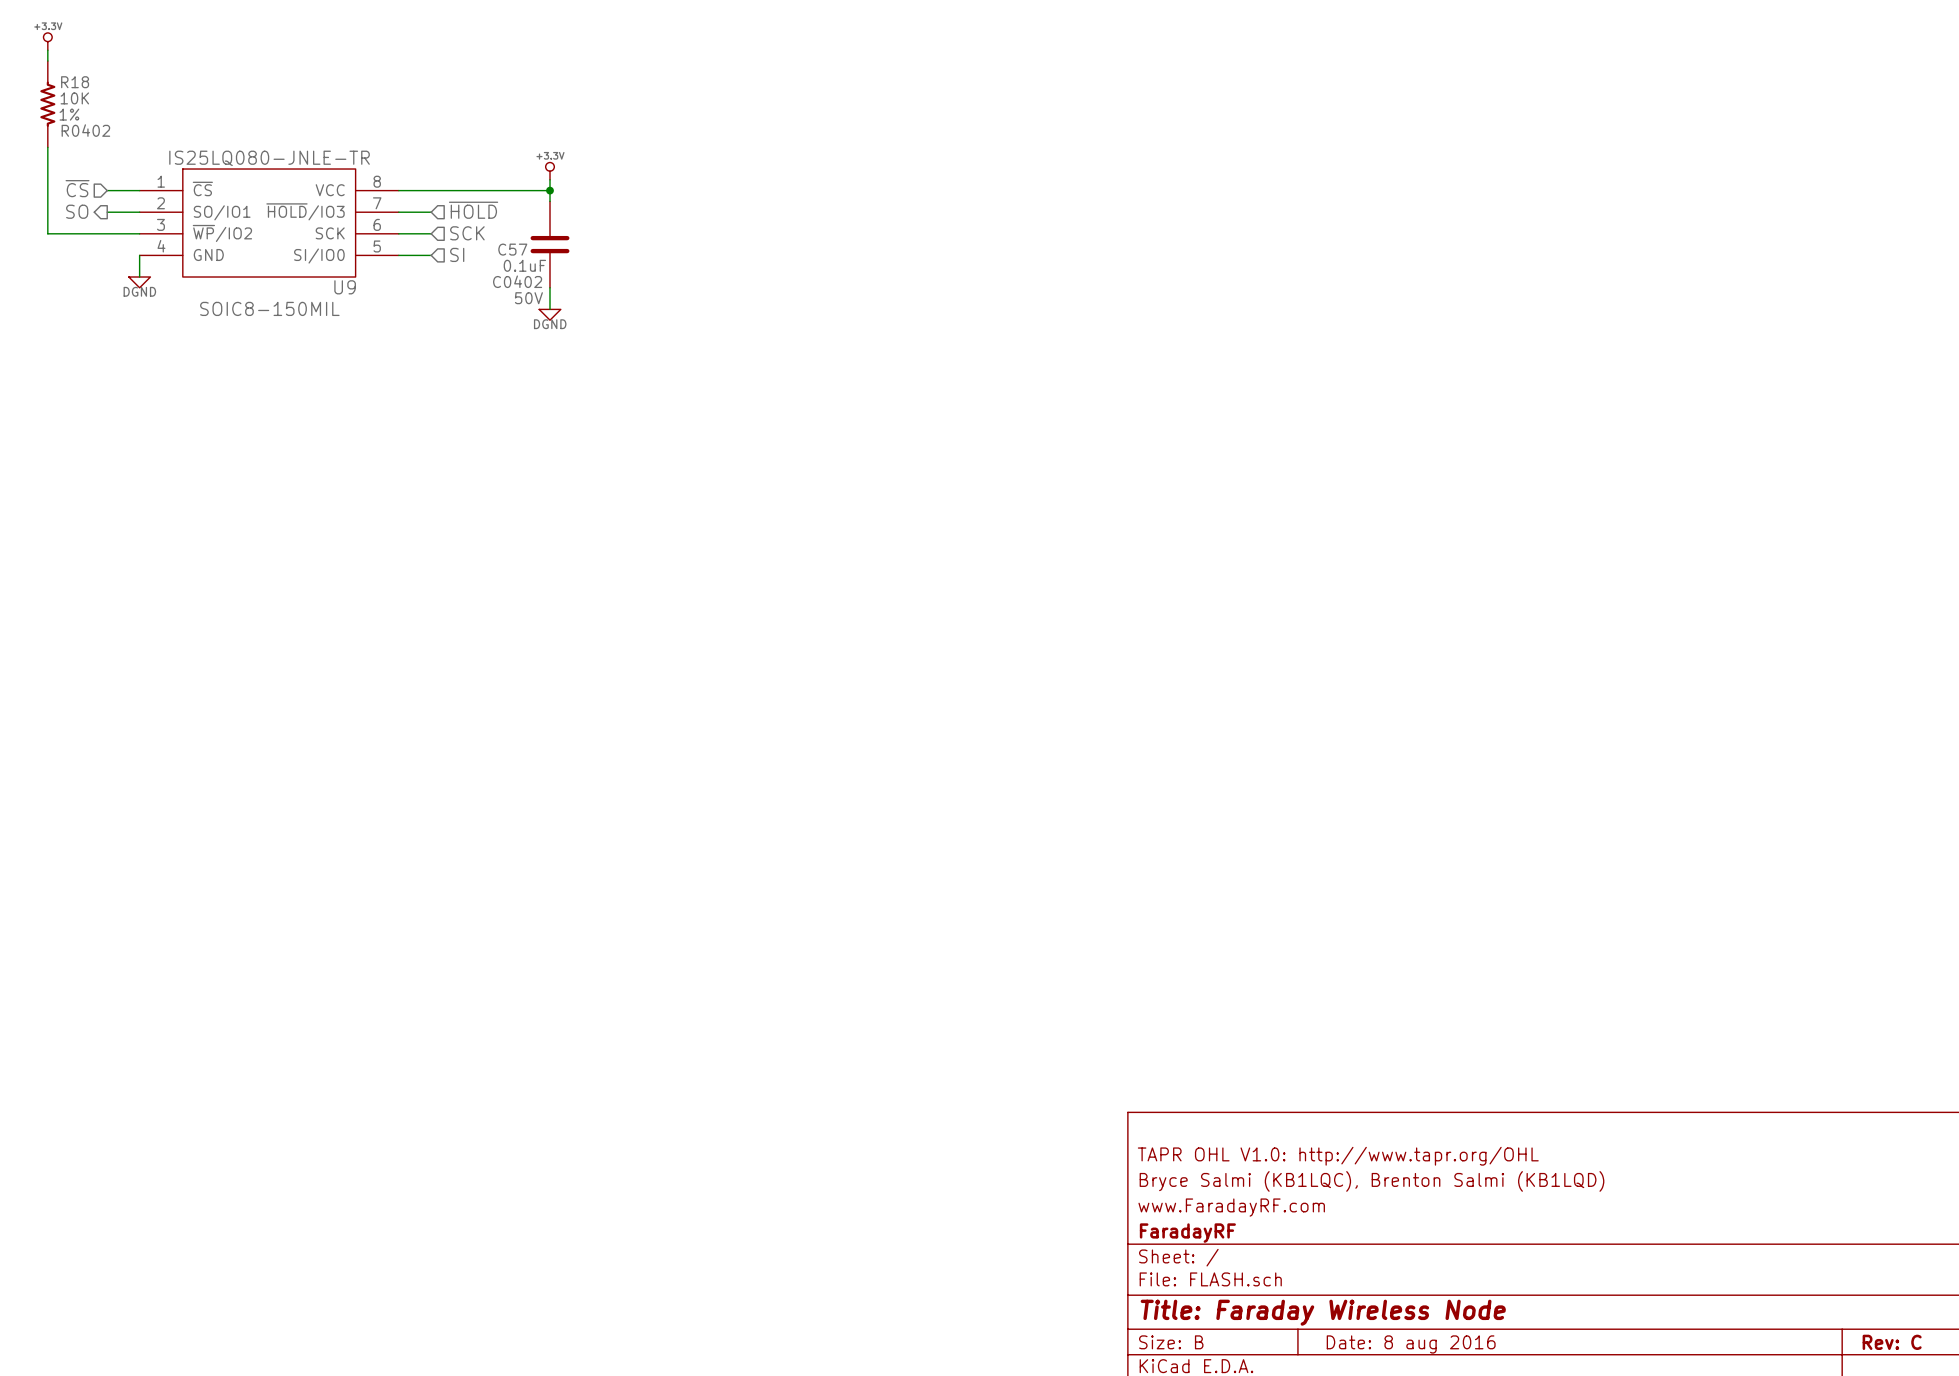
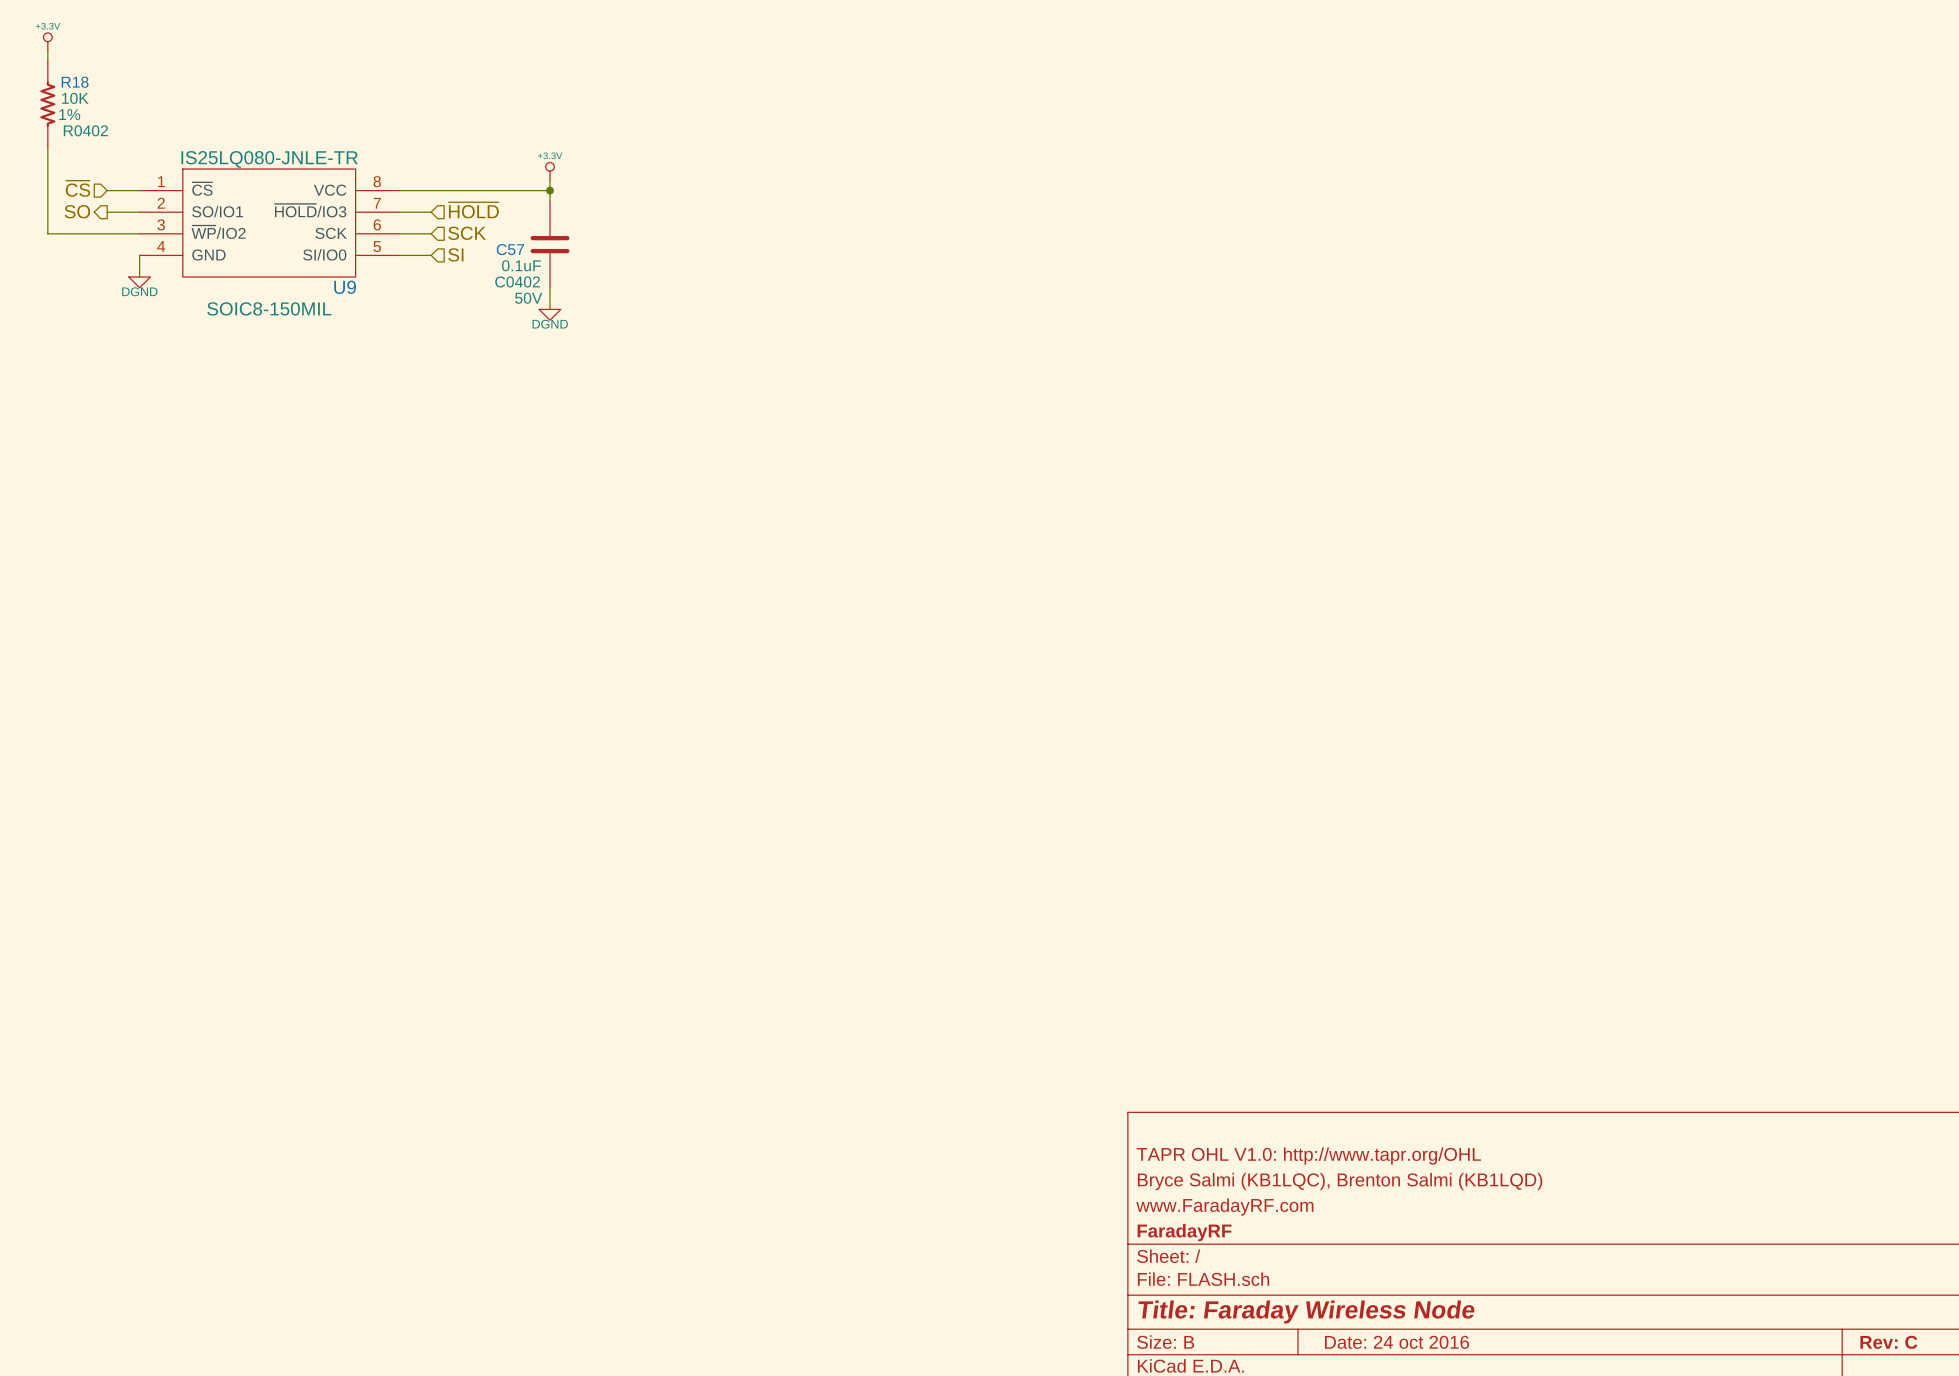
title block: Date: 8 aug 2016 (1411, 1344) -> Date: 24 oct 2016 (1397, 1342)

